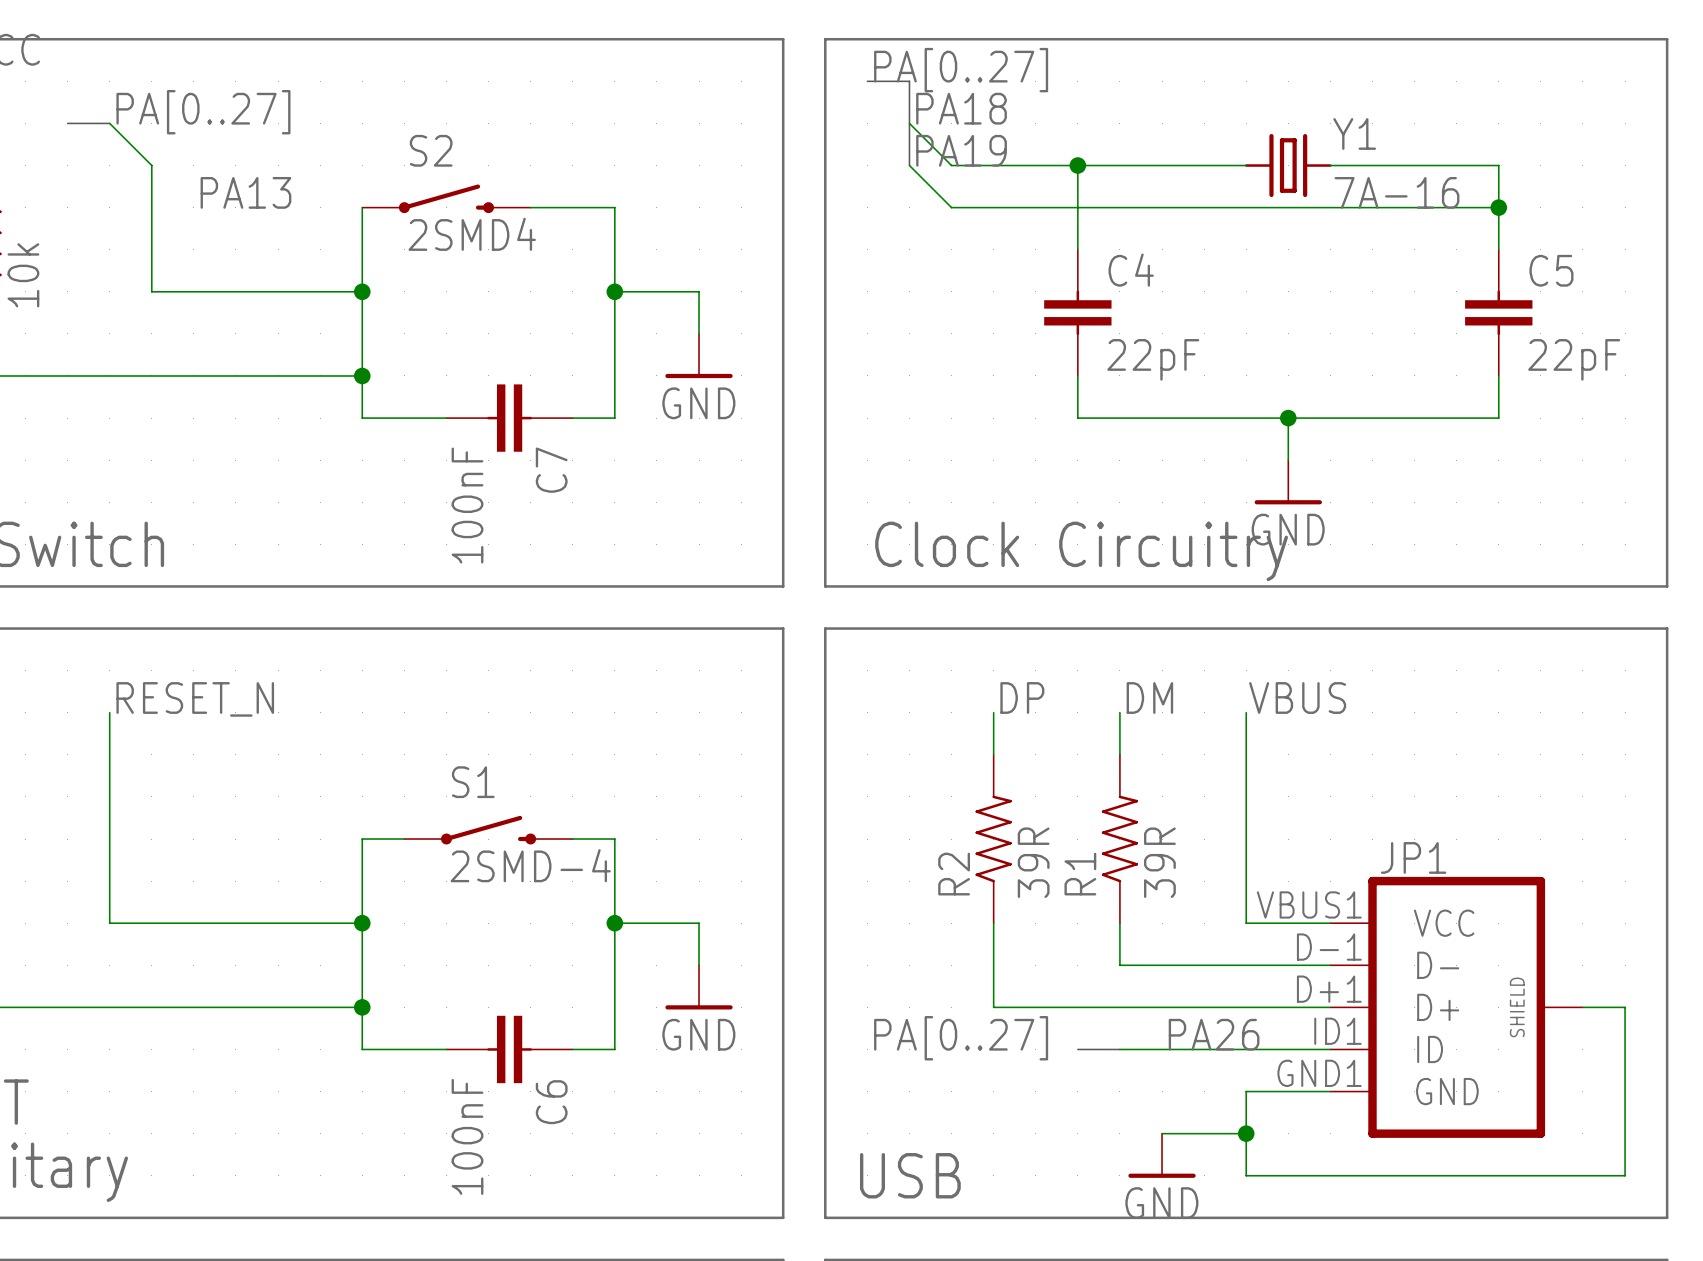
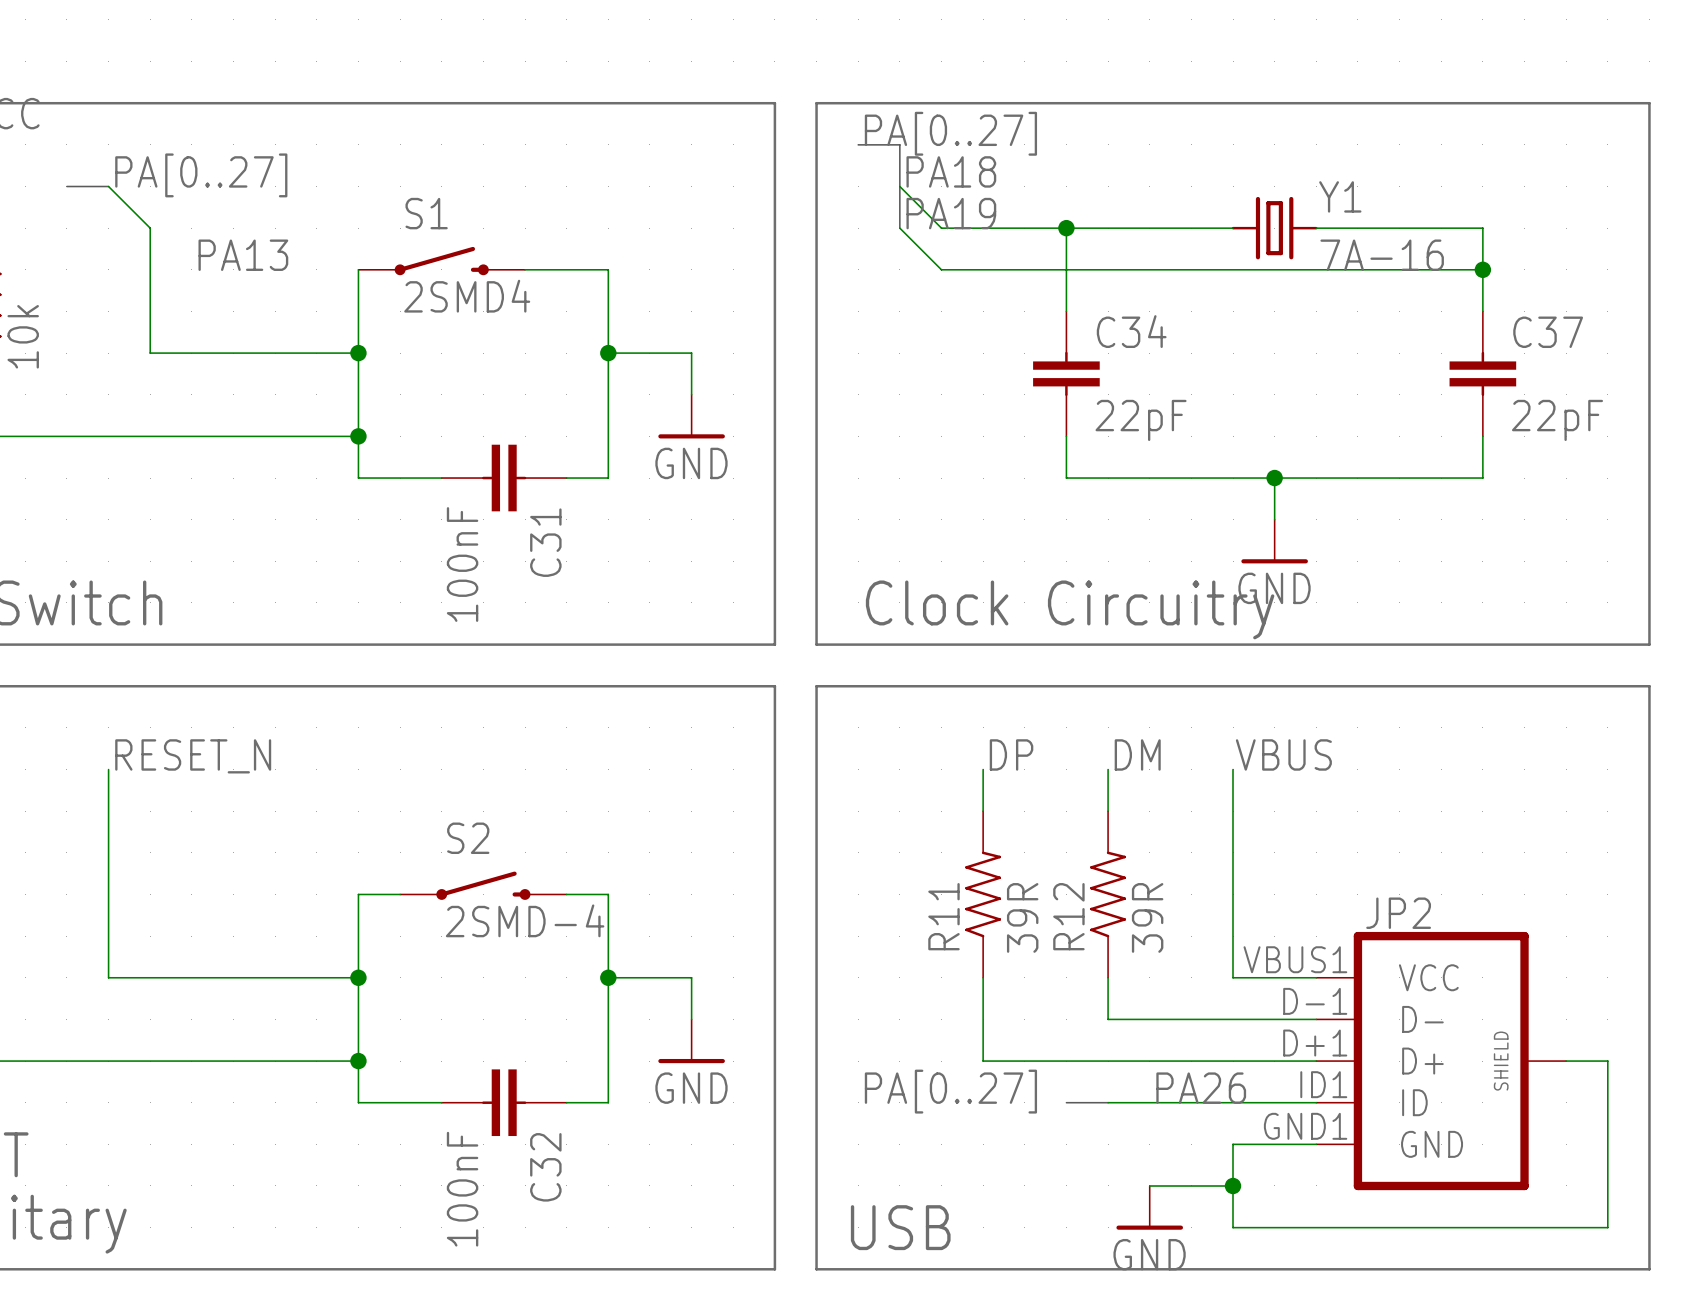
S2 name: S2 (431, 150) -> S1 (426, 213)
C4 name: C4 (1131, 270) -> C34 (1131, 331)
C5 name: C5 (1551, 270) -> C37 (1548, 332)
C7 name: C7 (551, 470) -> C31 (545, 542)
S1 name: S1 (473, 782) -> S2 (468, 838)
JP1 name: JP1 (1413, 857) -> JP2 (1398, 913)
R2 name: R2 (954, 874) -> R11 (943, 916)
R1 name: R1 (1080, 874) -> R12 (1068, 916)
C6 name: C6 (551, 1102) -> C32 (545, 1167)

